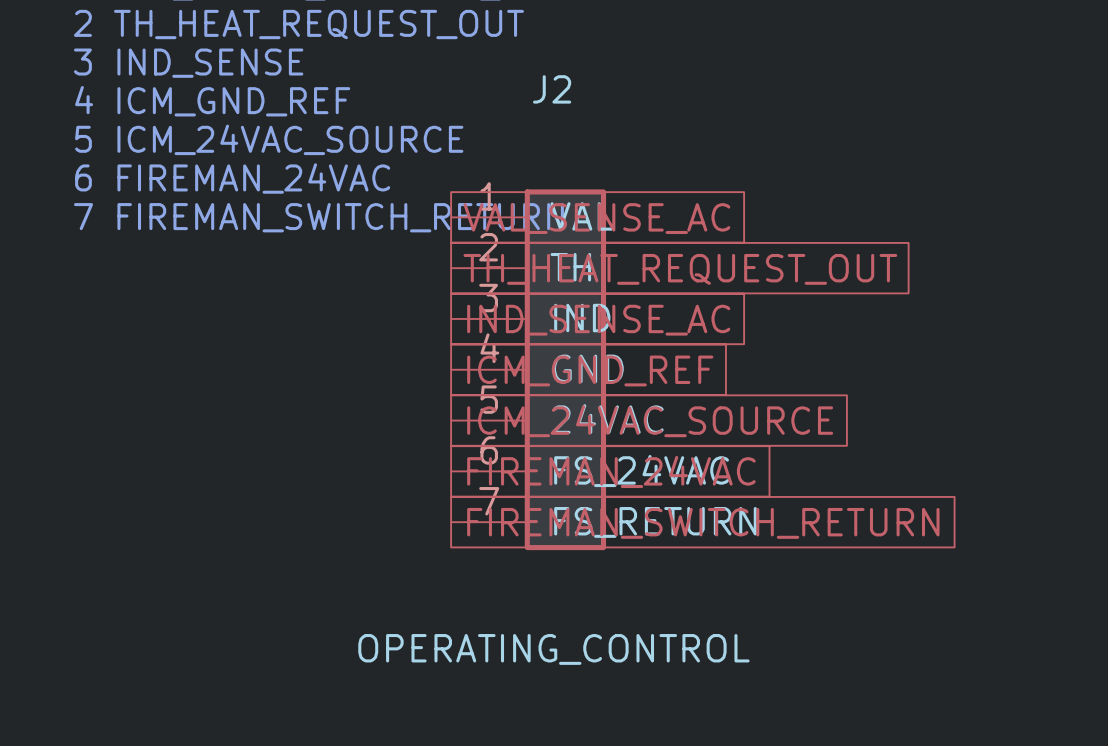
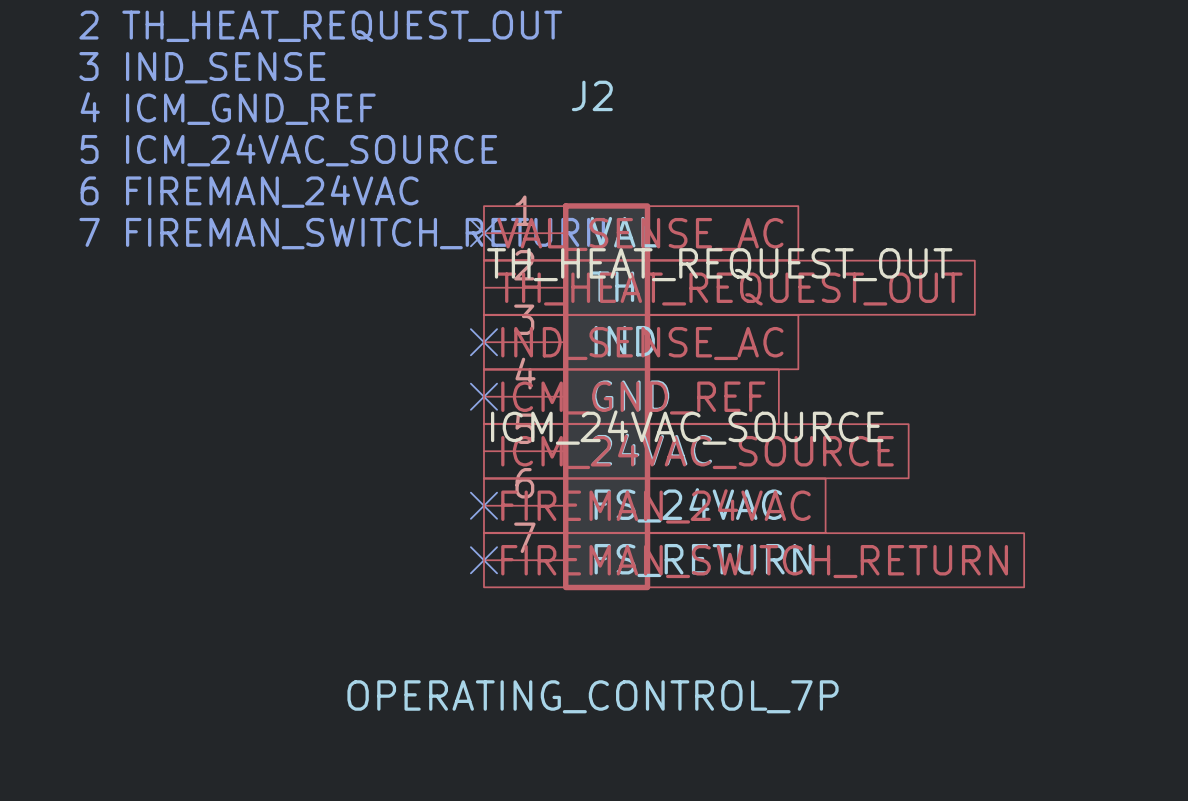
no-connect mark: none -> (483, 233)
label: none -> TH_HEAT_REQUEST_OUT (719, 264)
no-connect mark: none -> (483, 342)
no-connect mark: none -> (483, 396)
label: none -> ICM_24VAC_SOURCE (687, 427)
no-connect mark: none -> (483, 505)
no-connect mark: none -> (483, 560)
J2 value: OPERATING_CONTROL (553, 649) -> OPERATING_CONTROL_7P (593, 696)

